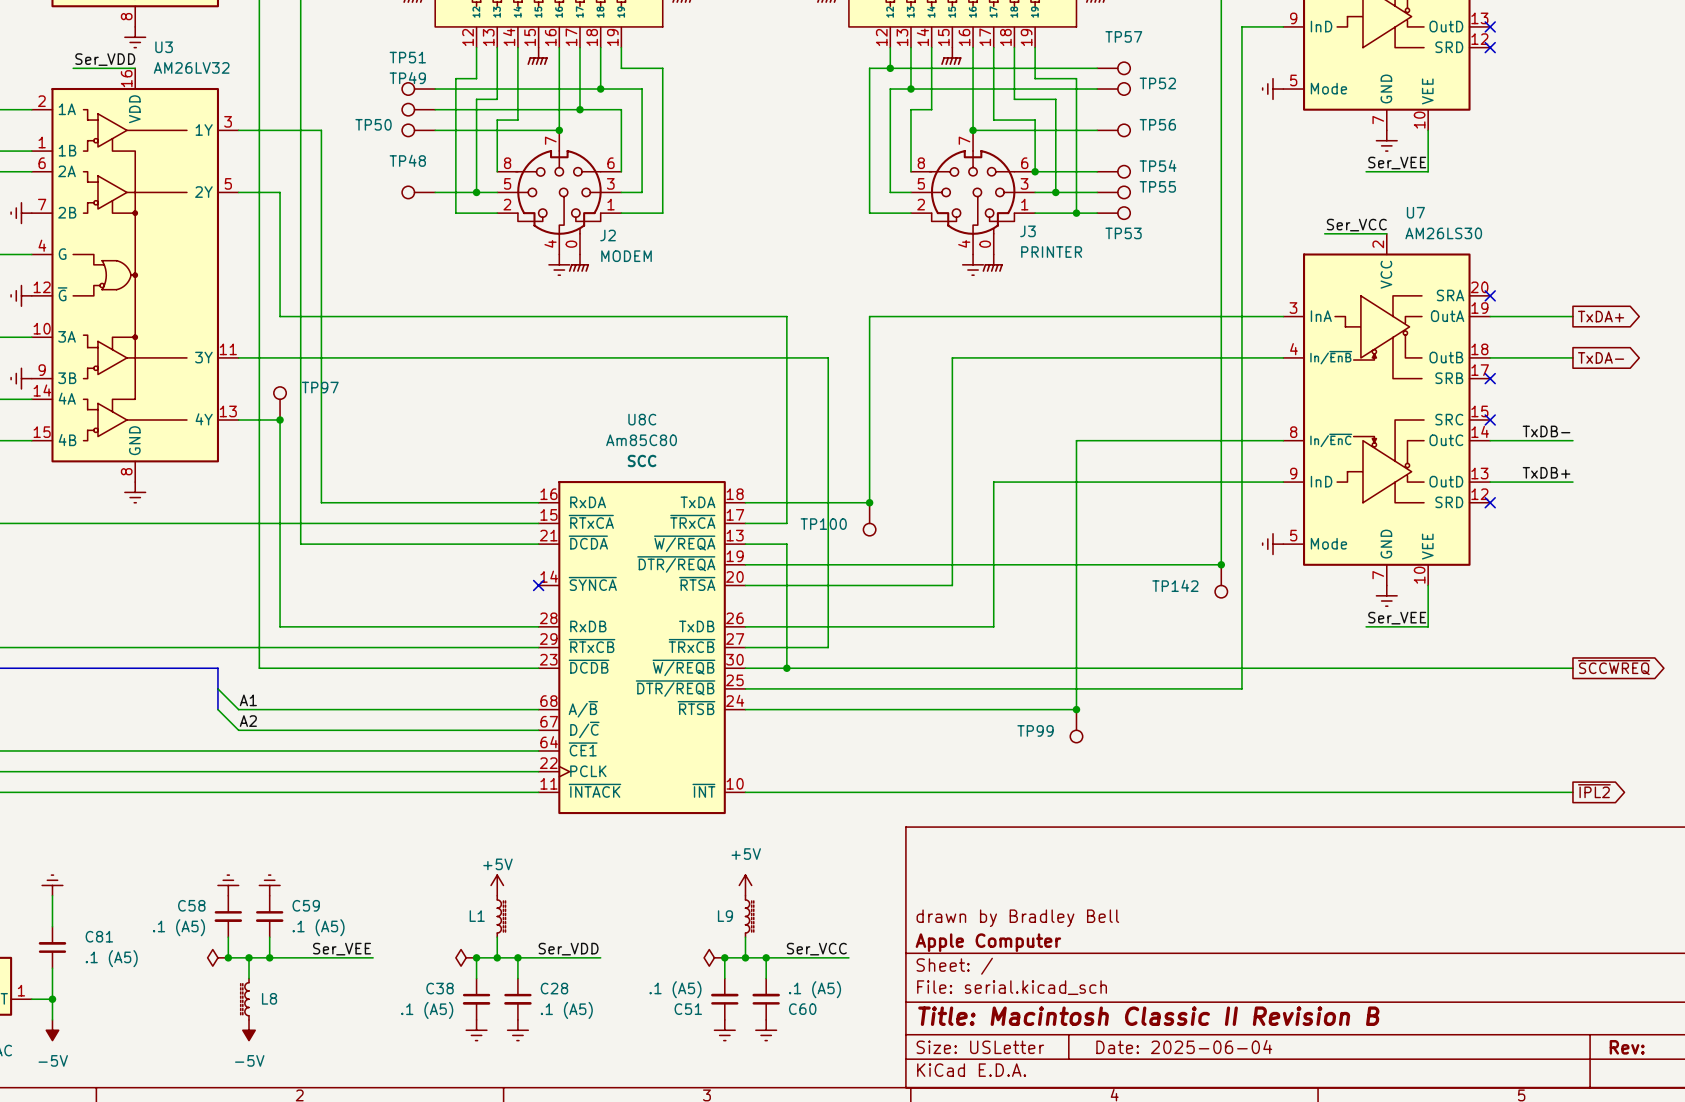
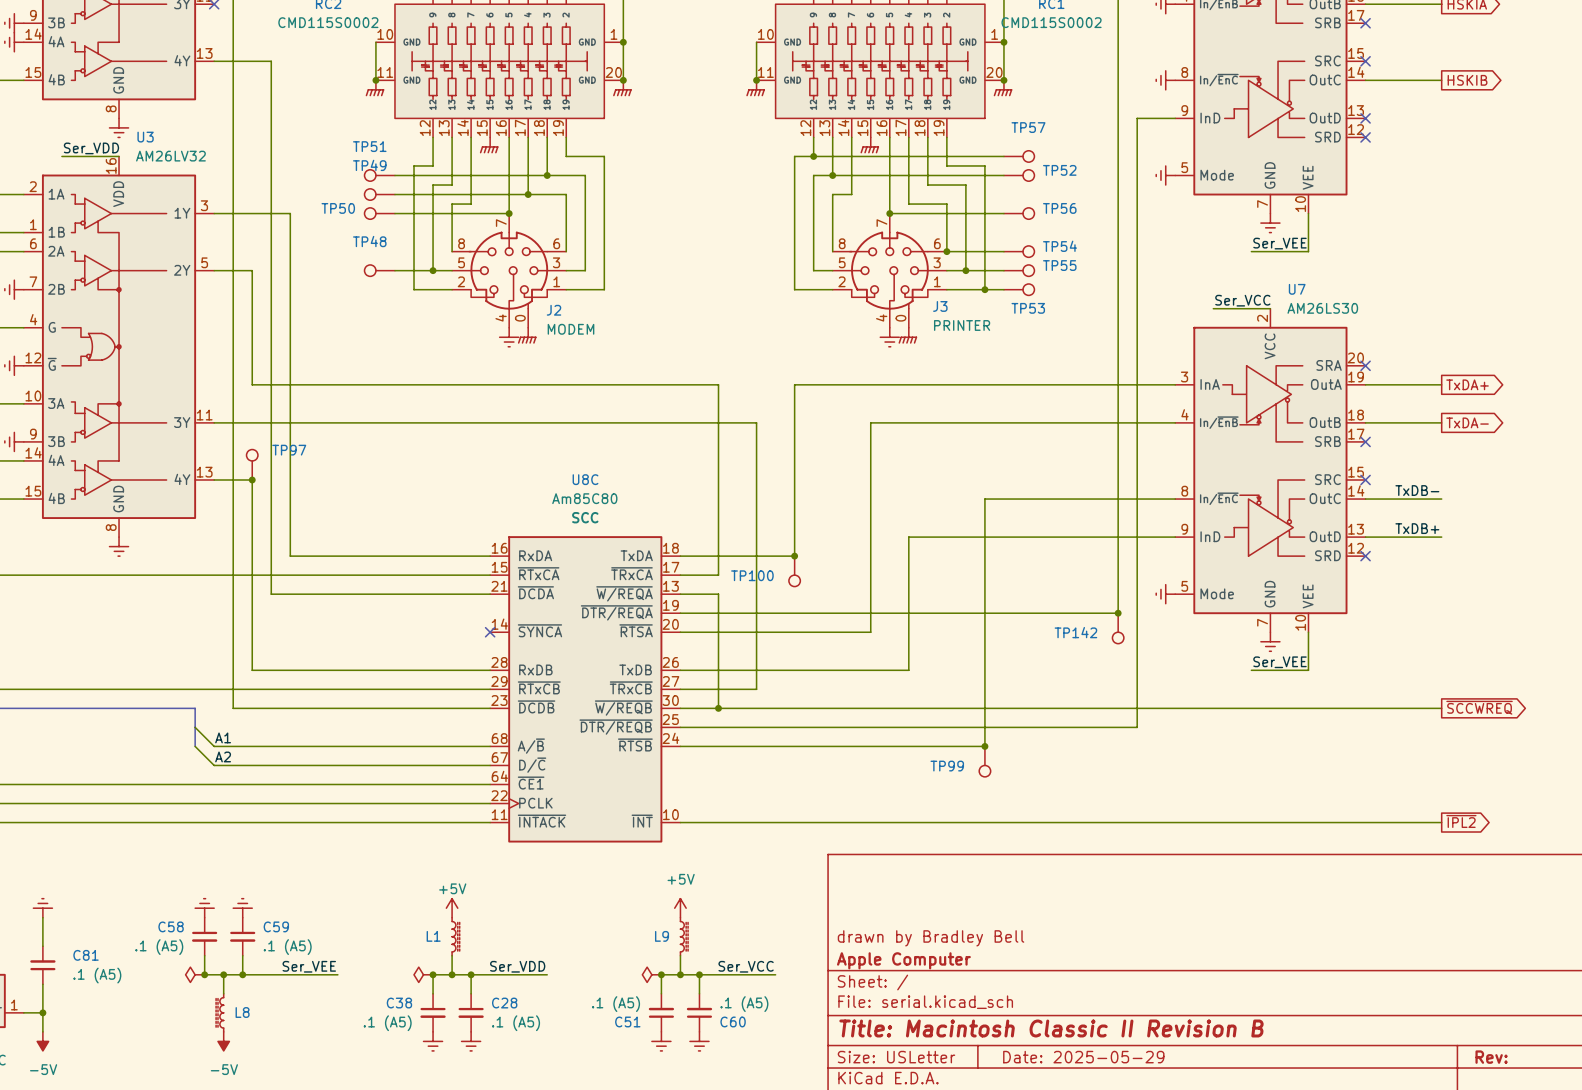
title block: Date: 2025-06-04 (1184, 1047) -> Date: 2025-05-29 (1083, 1057)

